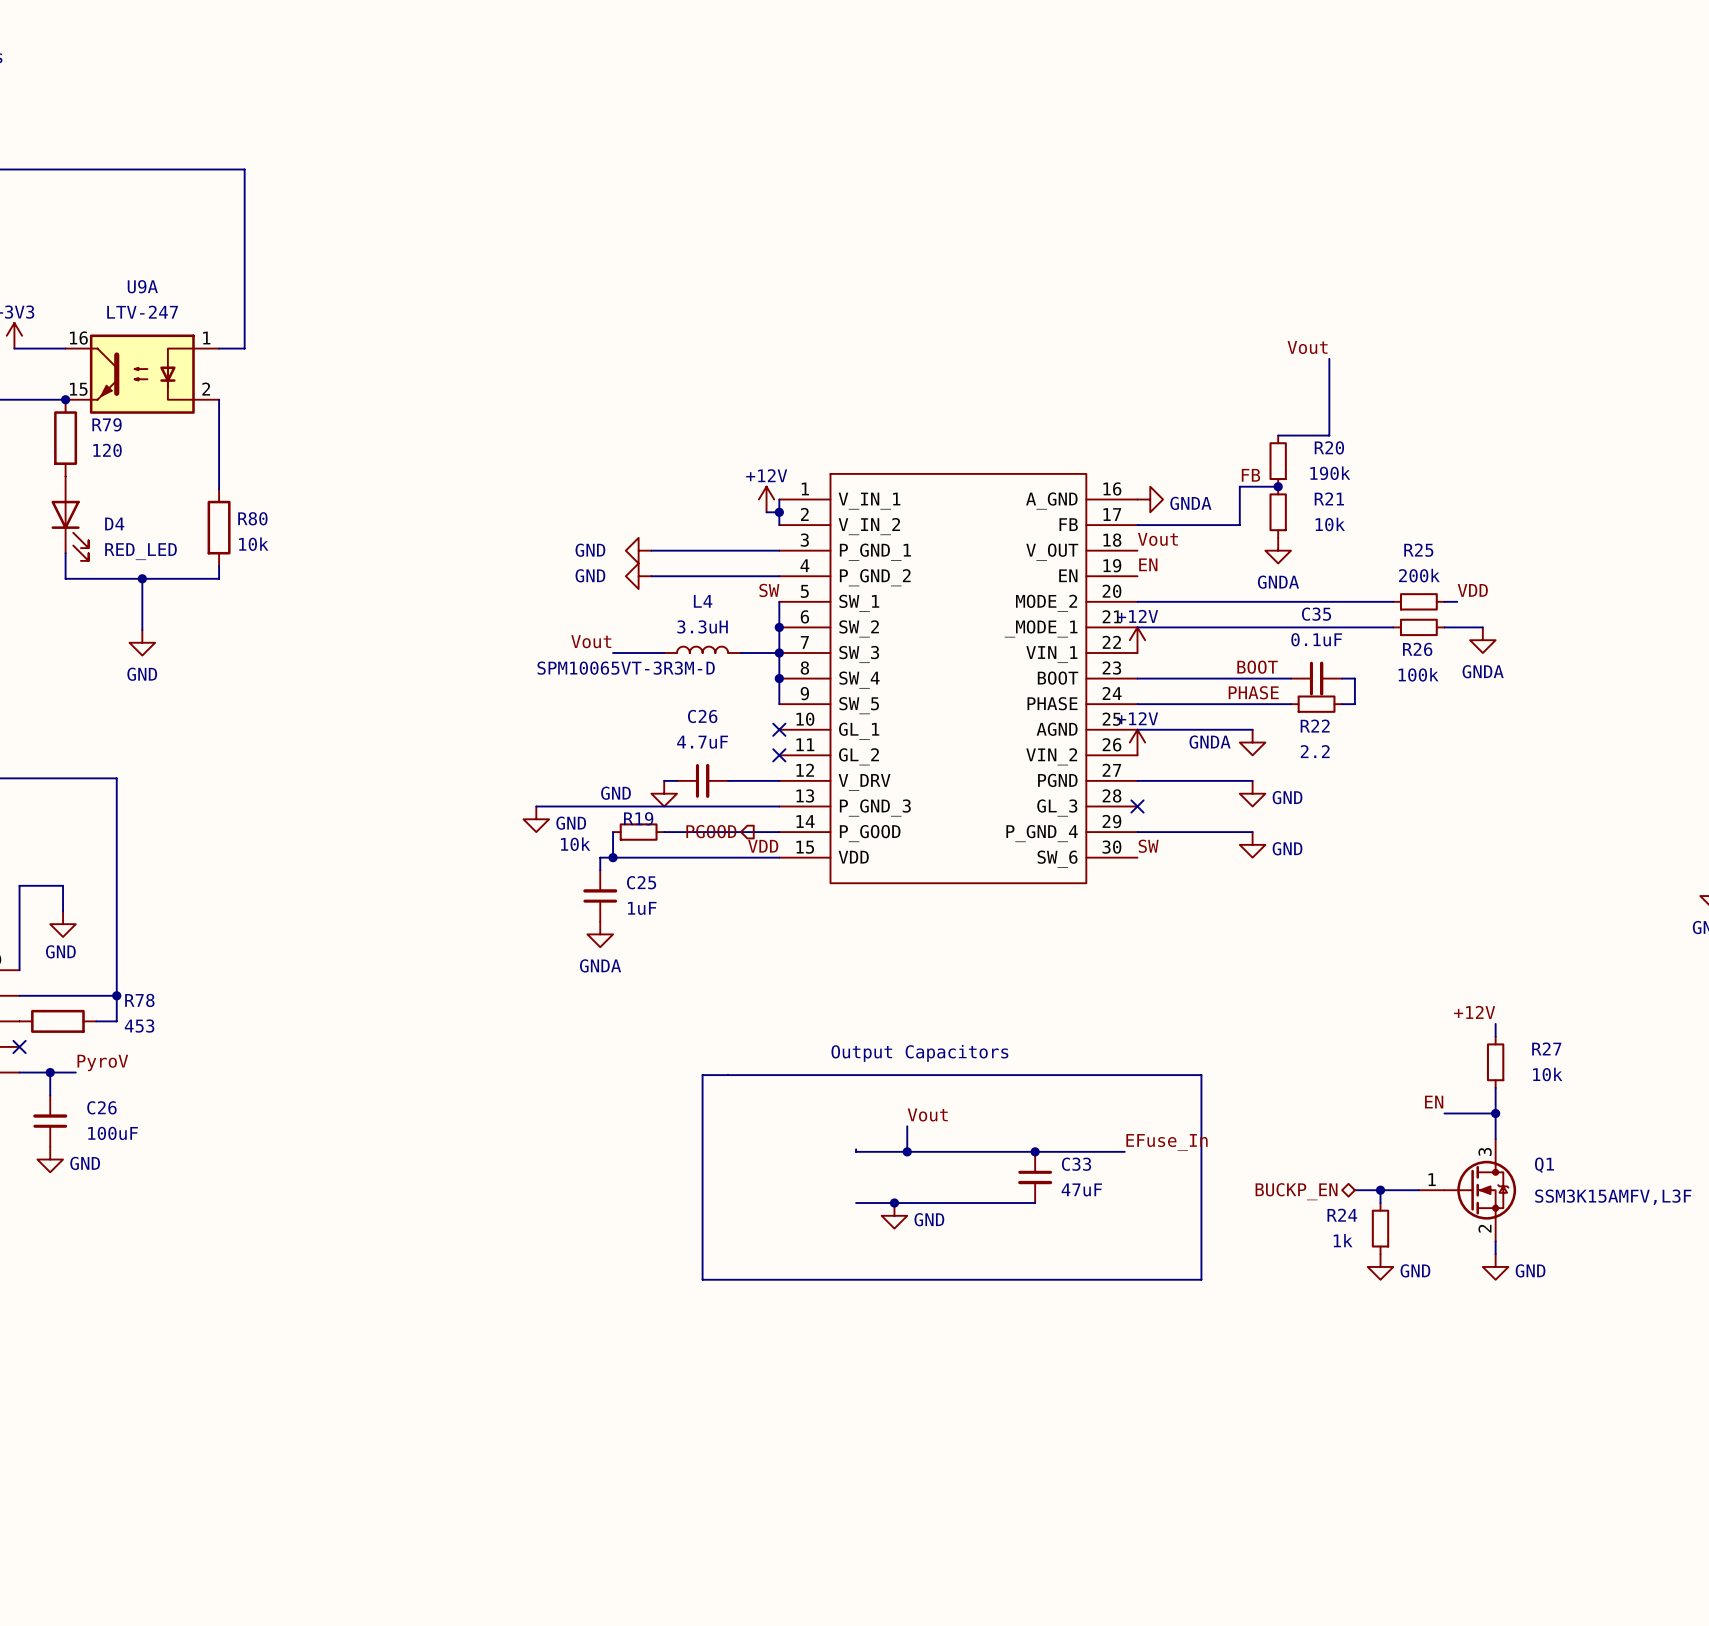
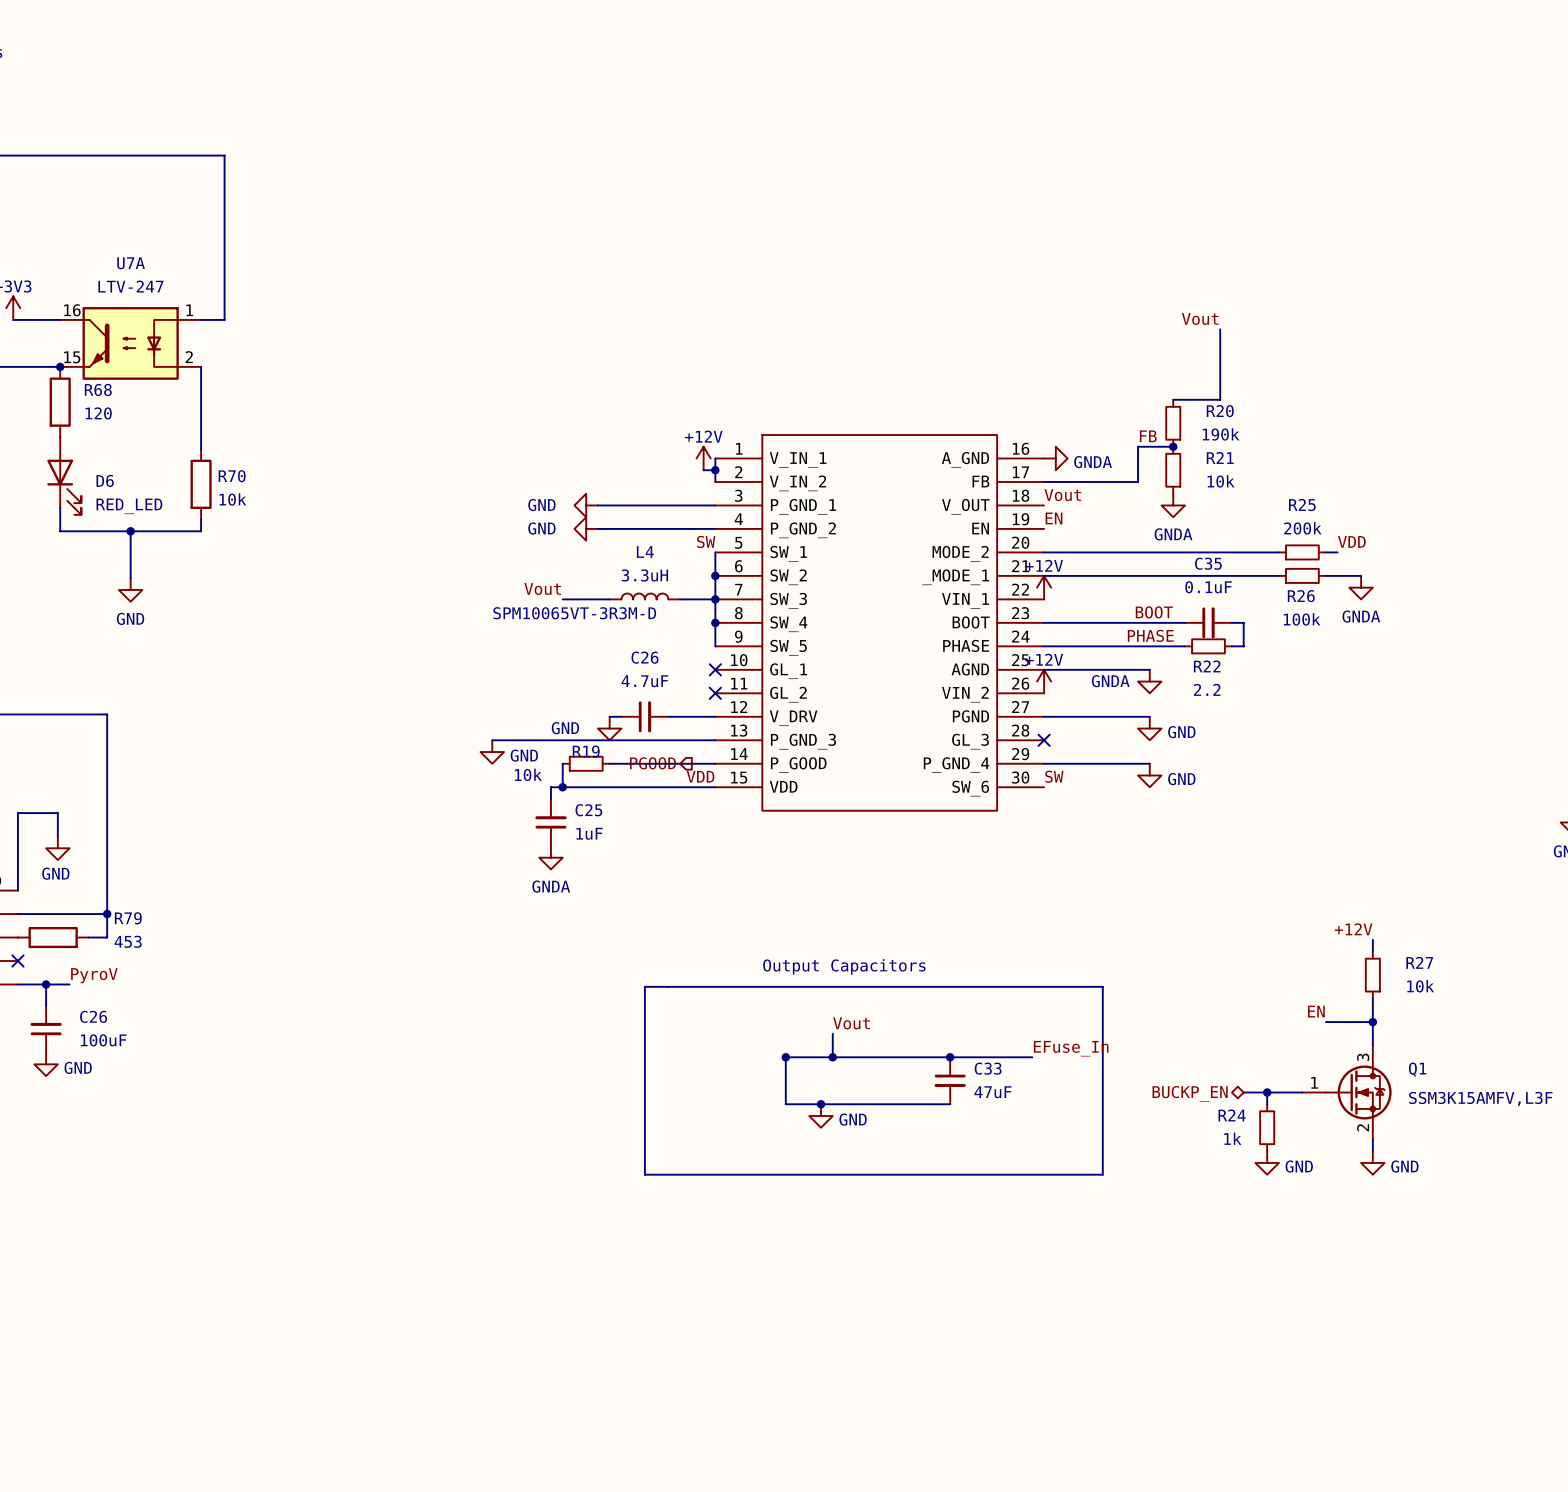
U9A name: U9A (142, 286) -> U7A (131, 263)
R79 name: R79 (107, 424) -> R68 (98, 389)
R80 name: R80 (252, 518) -> R70 (232, 476)
D4 name: D4 (114, 523) -> D6 (105, 480)
R78 name: R78 (139, 1000) -> R79 (128, 918)
wire: none -> (785, 1057) (785, 1104)
junction: none -> (785, 1057)

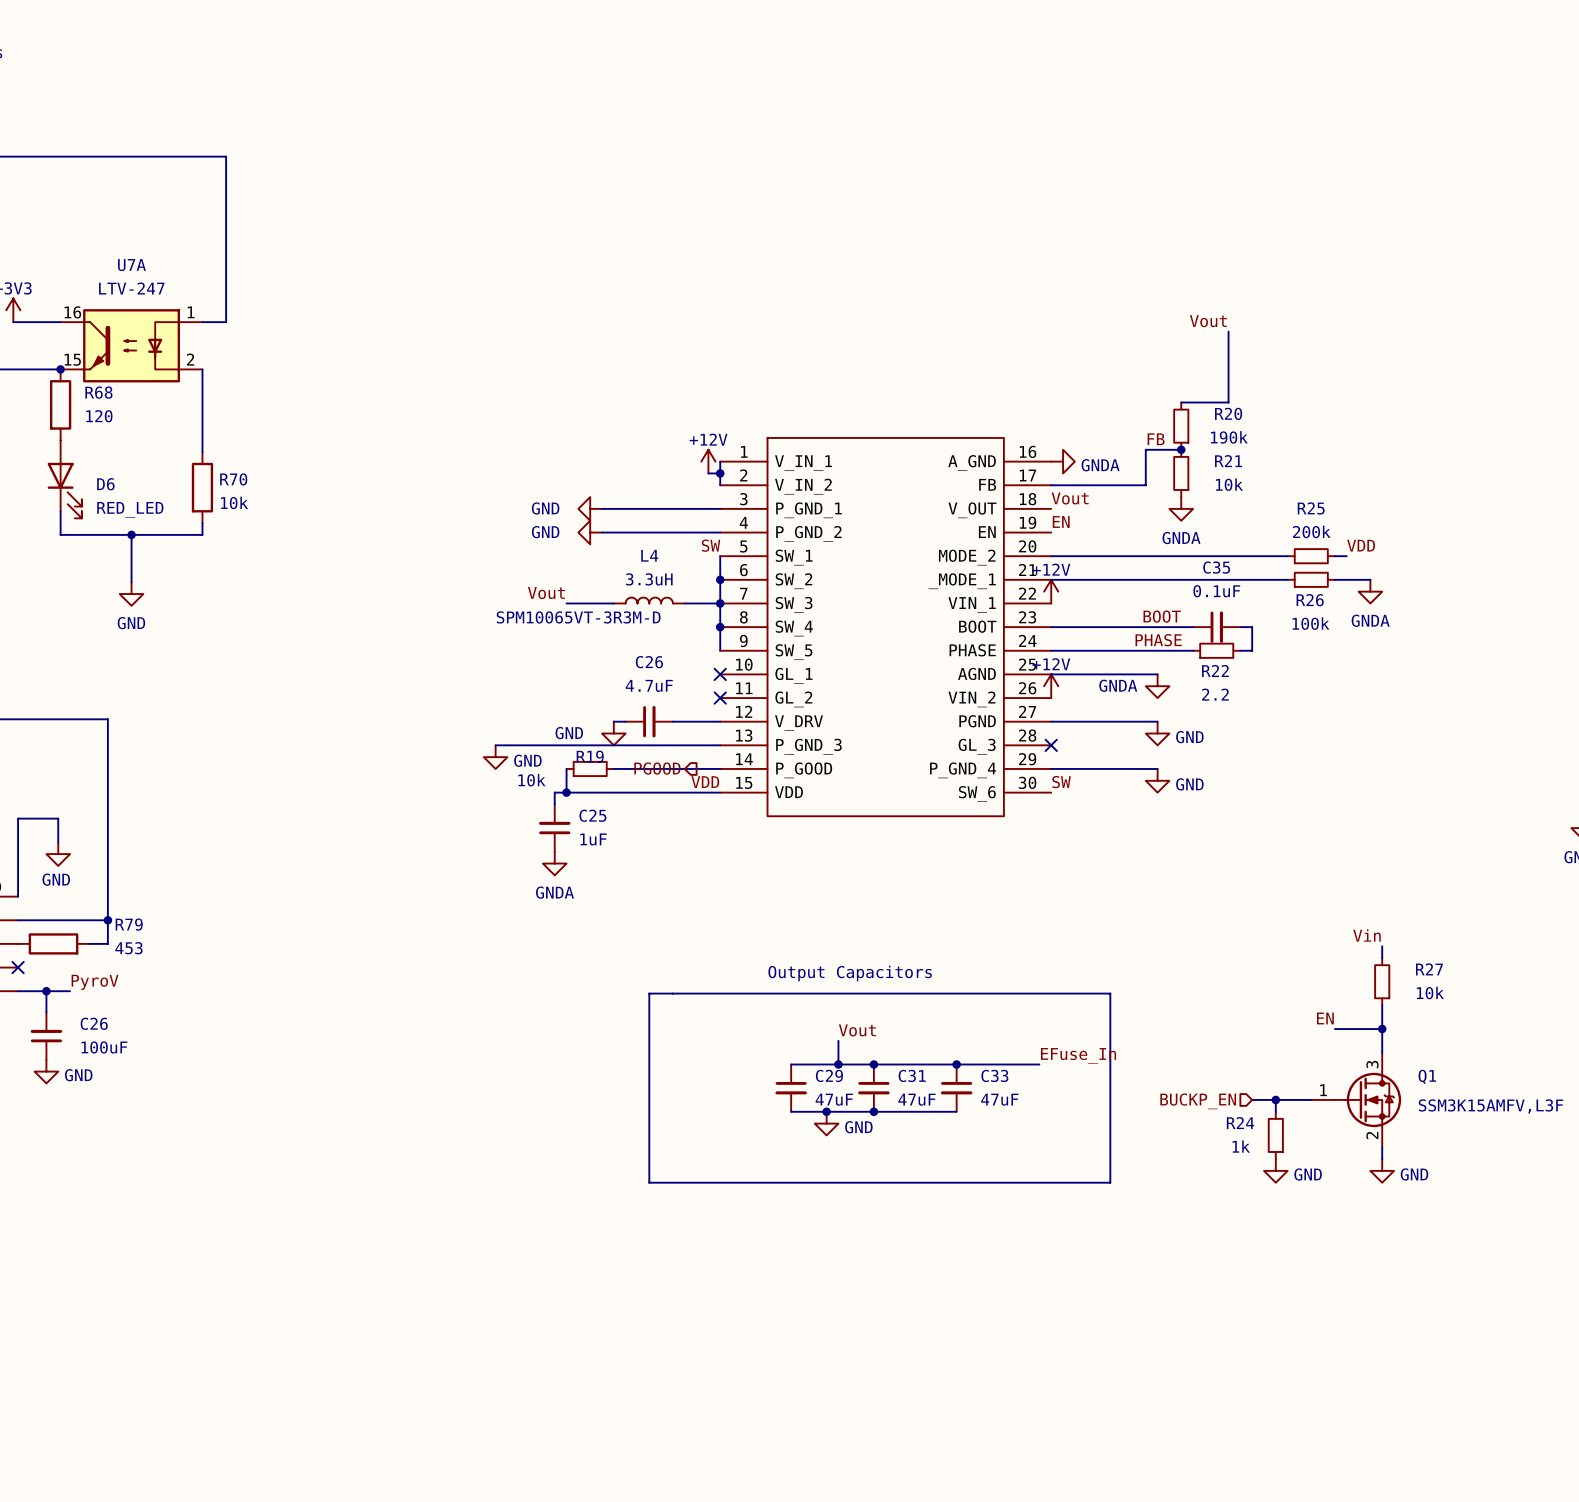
label: +12V (1353, 929) -> Vin (1367, 935)
junction: (785, 1057) -> none
junction: none -> (873, 1064)
C29: none -> 47uF (791, 1088)
C31: none -> 47uF (873, 1088)
hierarchical label shape: bidirectional (1190, 1093) -> input (1198, 1101)
junction: none -> (873, 1111)

